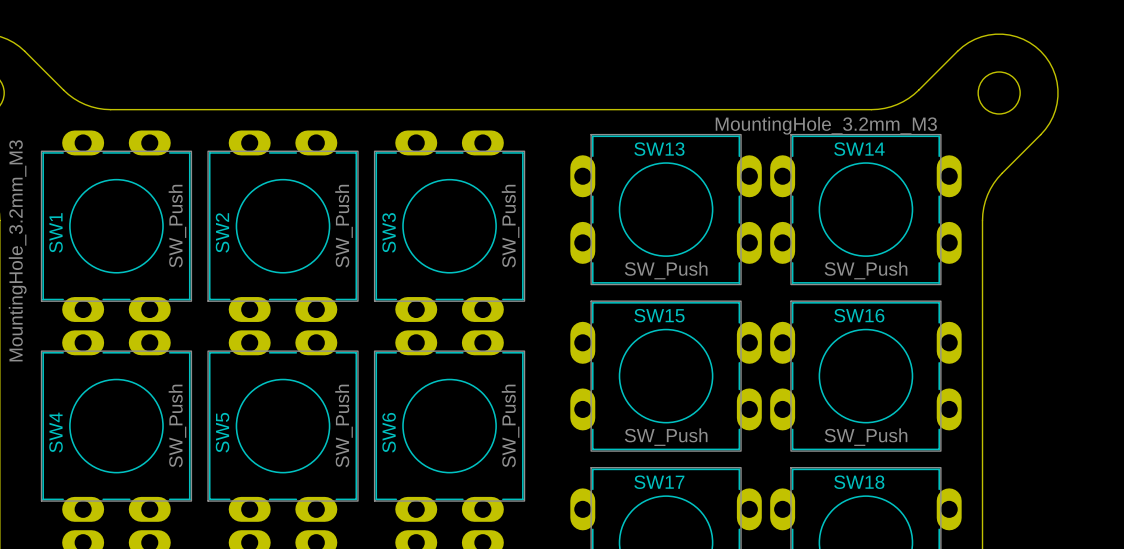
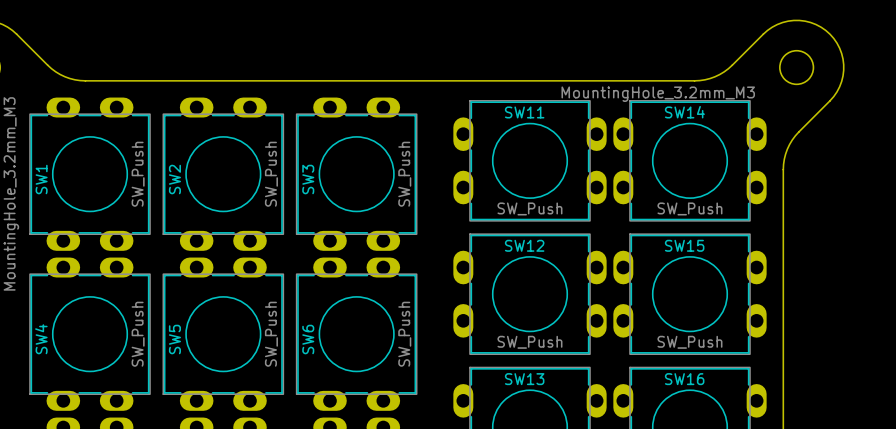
SW13 name: SW13 (659, 149) -> SW11 (524, 112)
SW15 name: SW15 (659, 315) -> SW12 (524, 245)
SW16 name: SW16 (859, 315) -> SW15 (684, 245)
SW17 name: SW17 (659, 482) -> SW13 (524, 379)
SW18 name: SW18 (859, 482) -> SW16 (684, 379)

